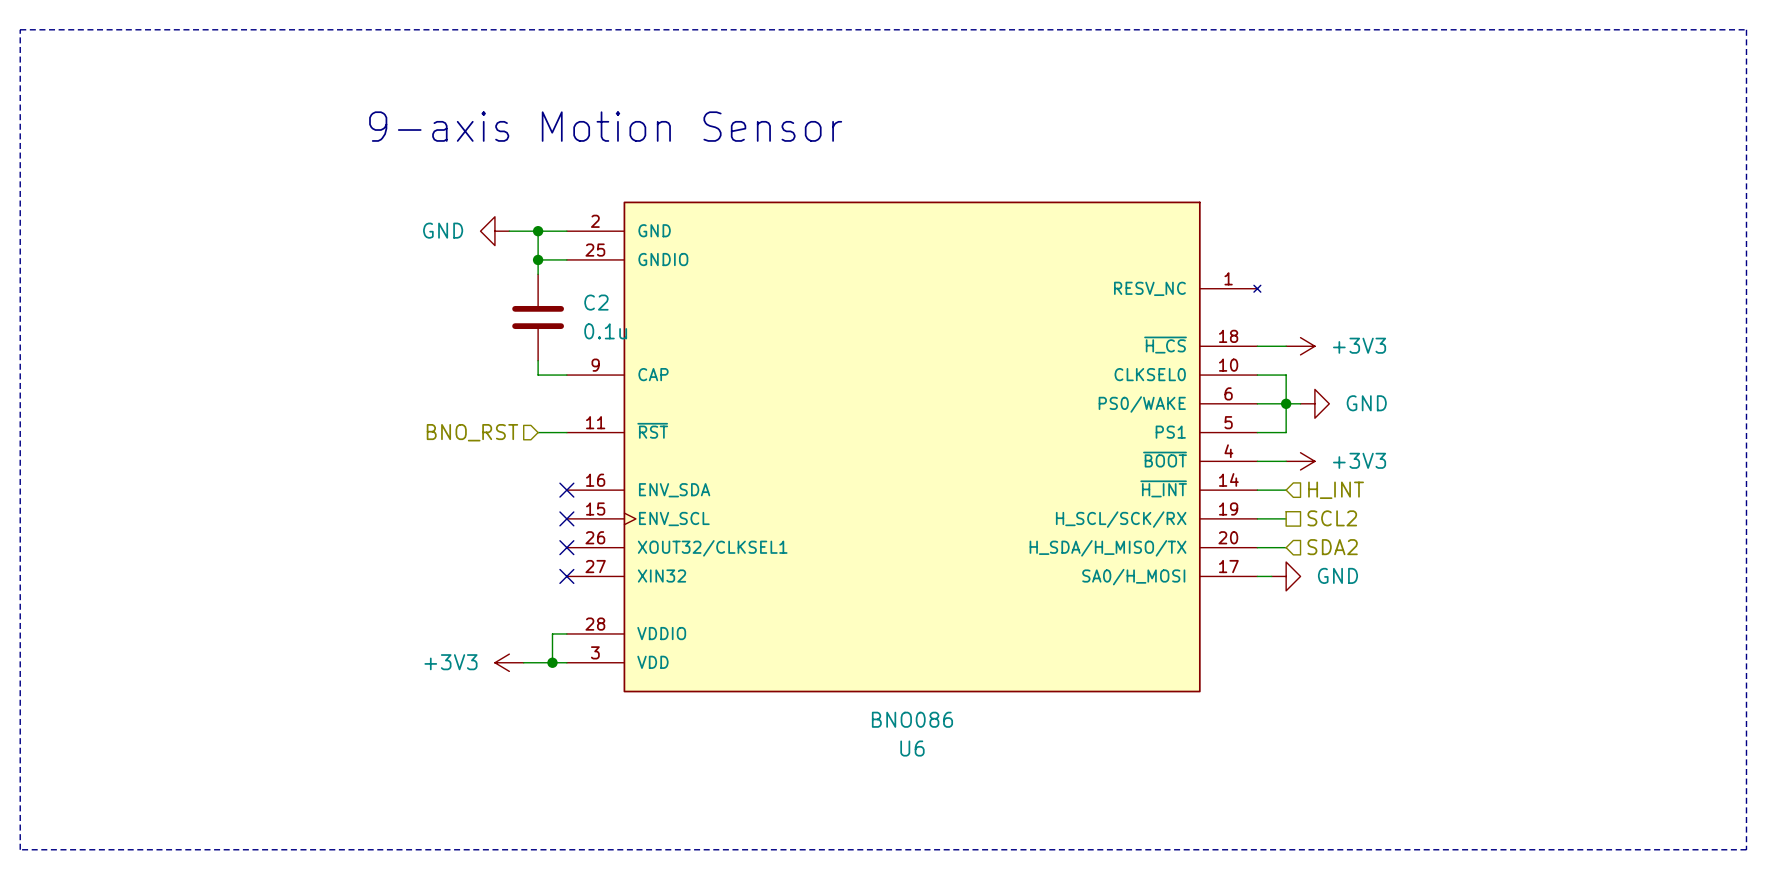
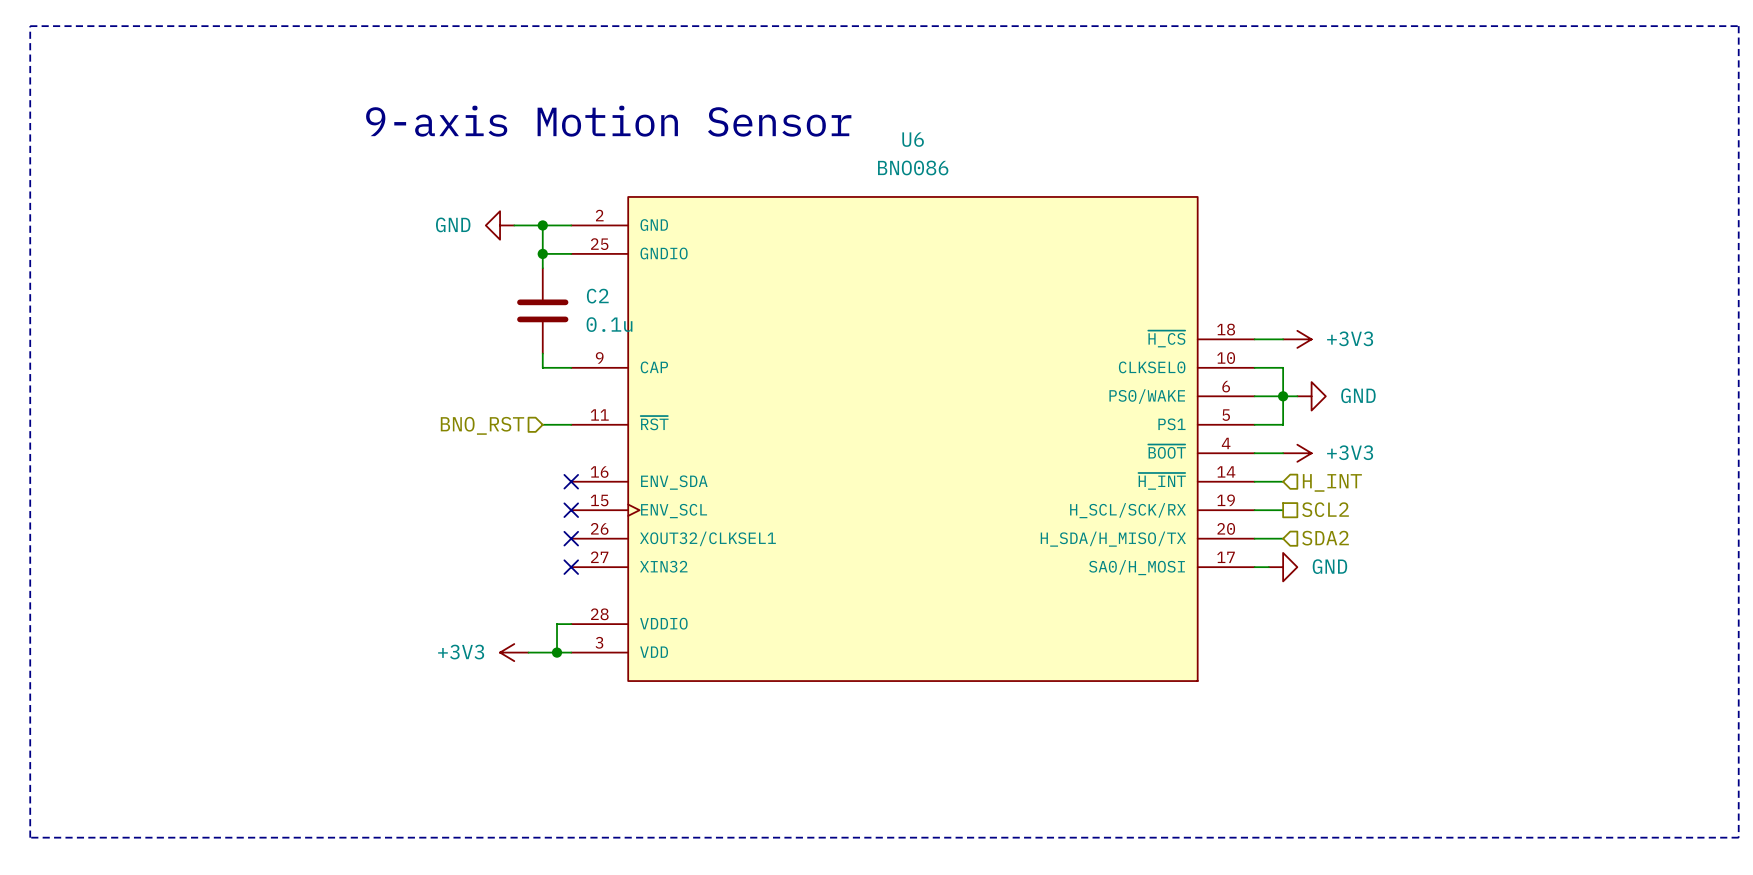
U6 symbol: [566, 201, 1261, 693] -> [571, 196, 1255, 682]
U6 value position: BNO086 (912, 719) -> BNO086 (913, 167)
U6 name position: U6 (912, 748) -> U6 (913, 139)

